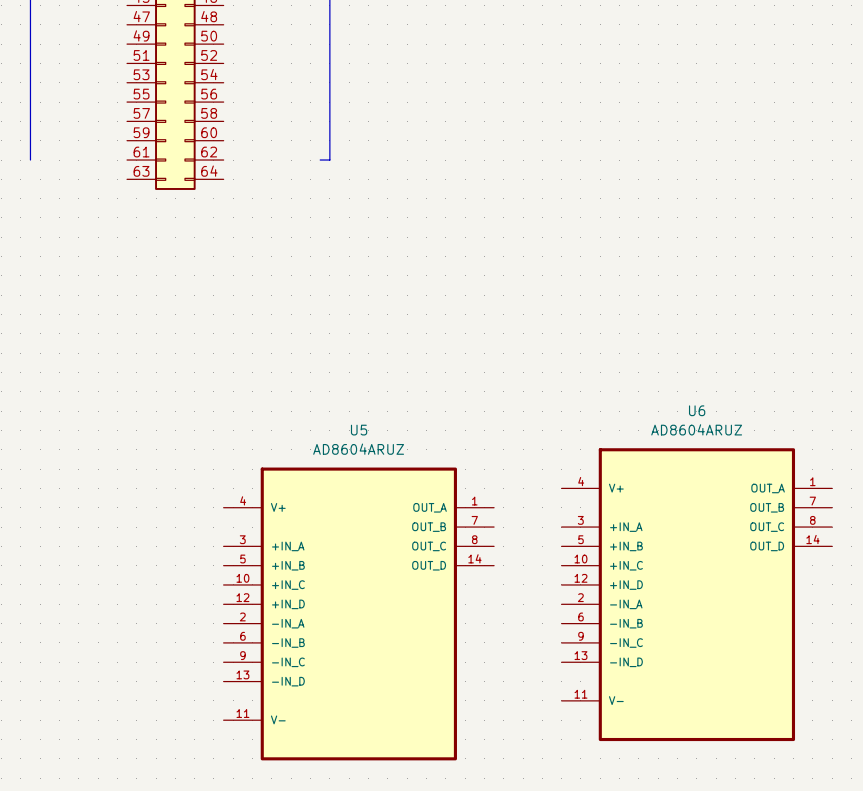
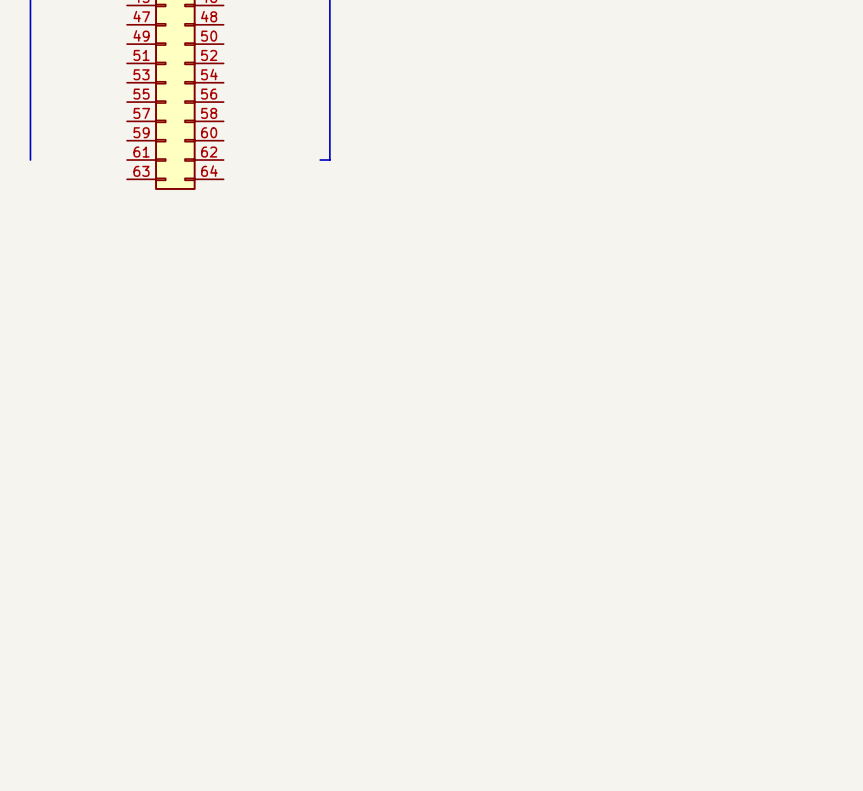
U6: AD8604ARUZ (696, 594) -> none
U5: AD8604ARUZ (358, 613) -> none

